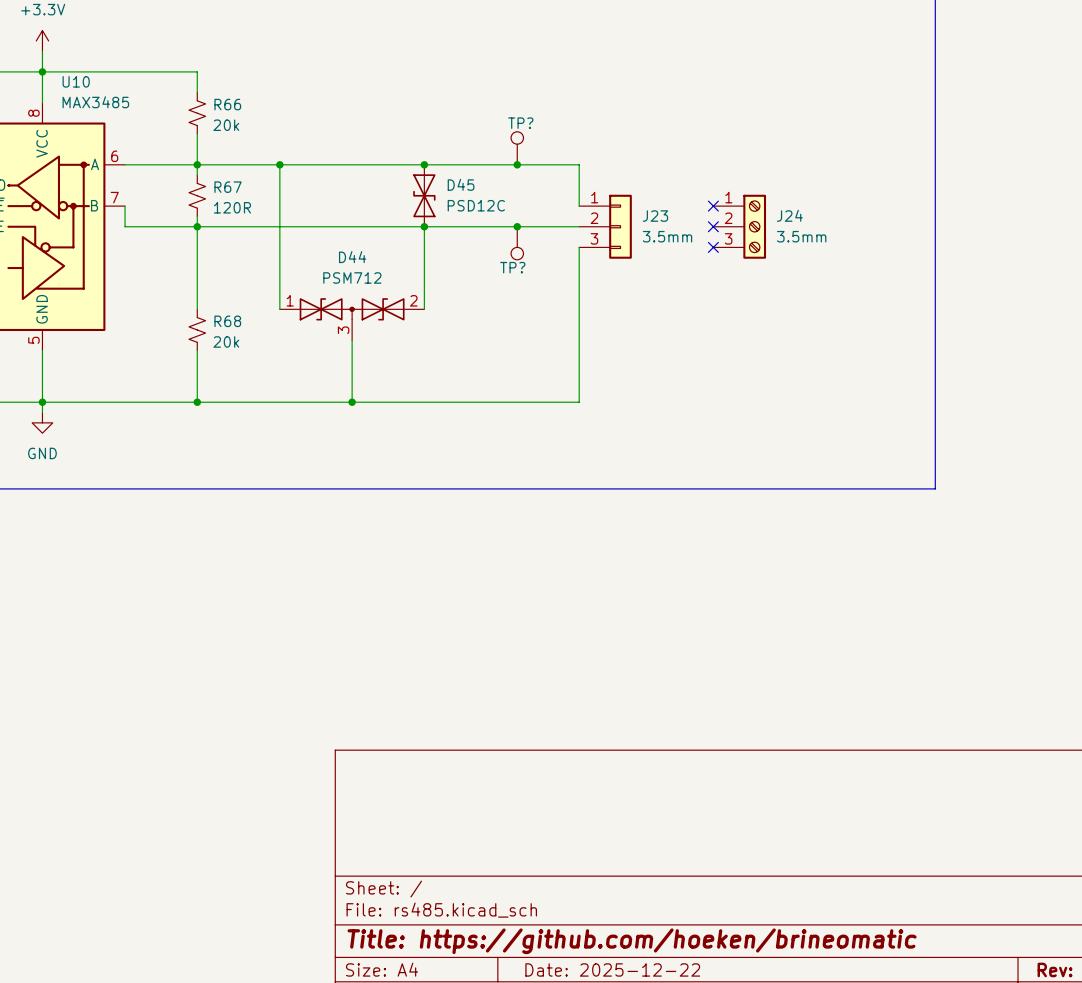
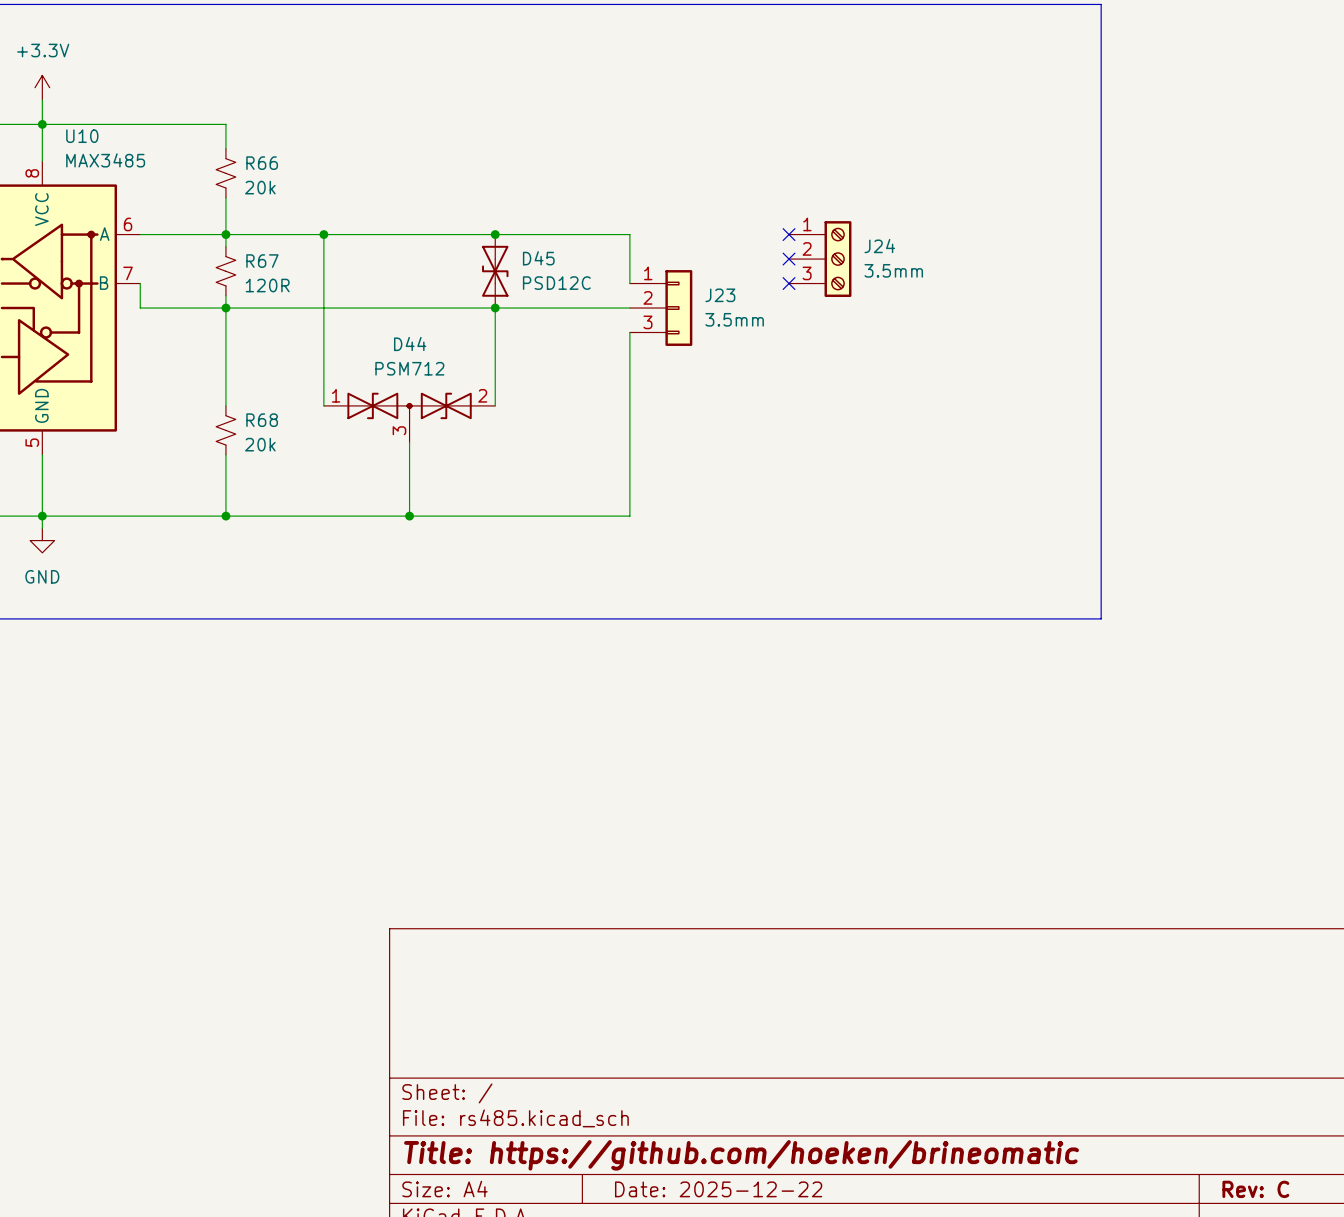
TP?: (517, 148) -> none
junction: (517, 164) -> none
wire: (537, 164) (579, 164) (579, 206) -> (629, 234) (629, 283)
no-connect mark: none -> (789, 234)
no-connect mark: none -> (789, 259)
no-connect mark: none -> (789, 283)
no-connect mark: (713, 206) -> none
junction: (517, 226) -> none
J23 position: (605, 226) -> (661, 308)
no-connect mark: (713, 226) -> none
J24 position: (739, 226) -> (820, 259)
TP?: (517, 243) -> none
wire: (579, 247) (579, 402) (537, 402) -> (629, 332) (629, 516)
no-connect mark: (713, 247) -> none

